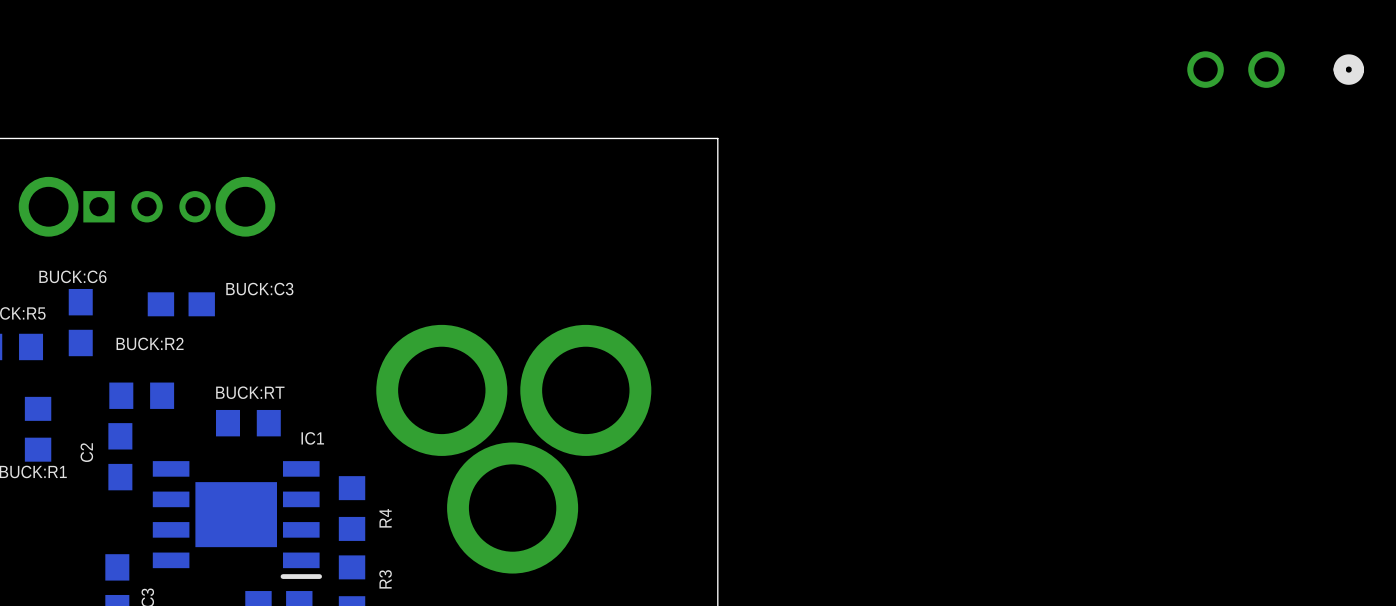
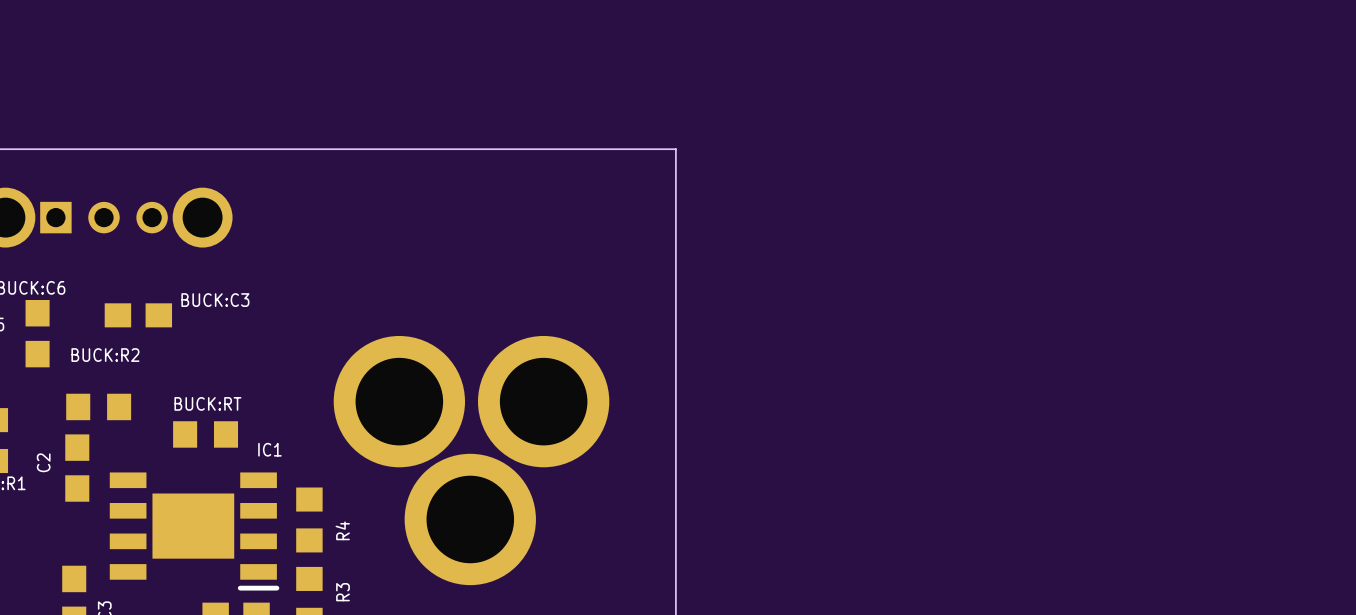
part: (1275, 69) -> none

